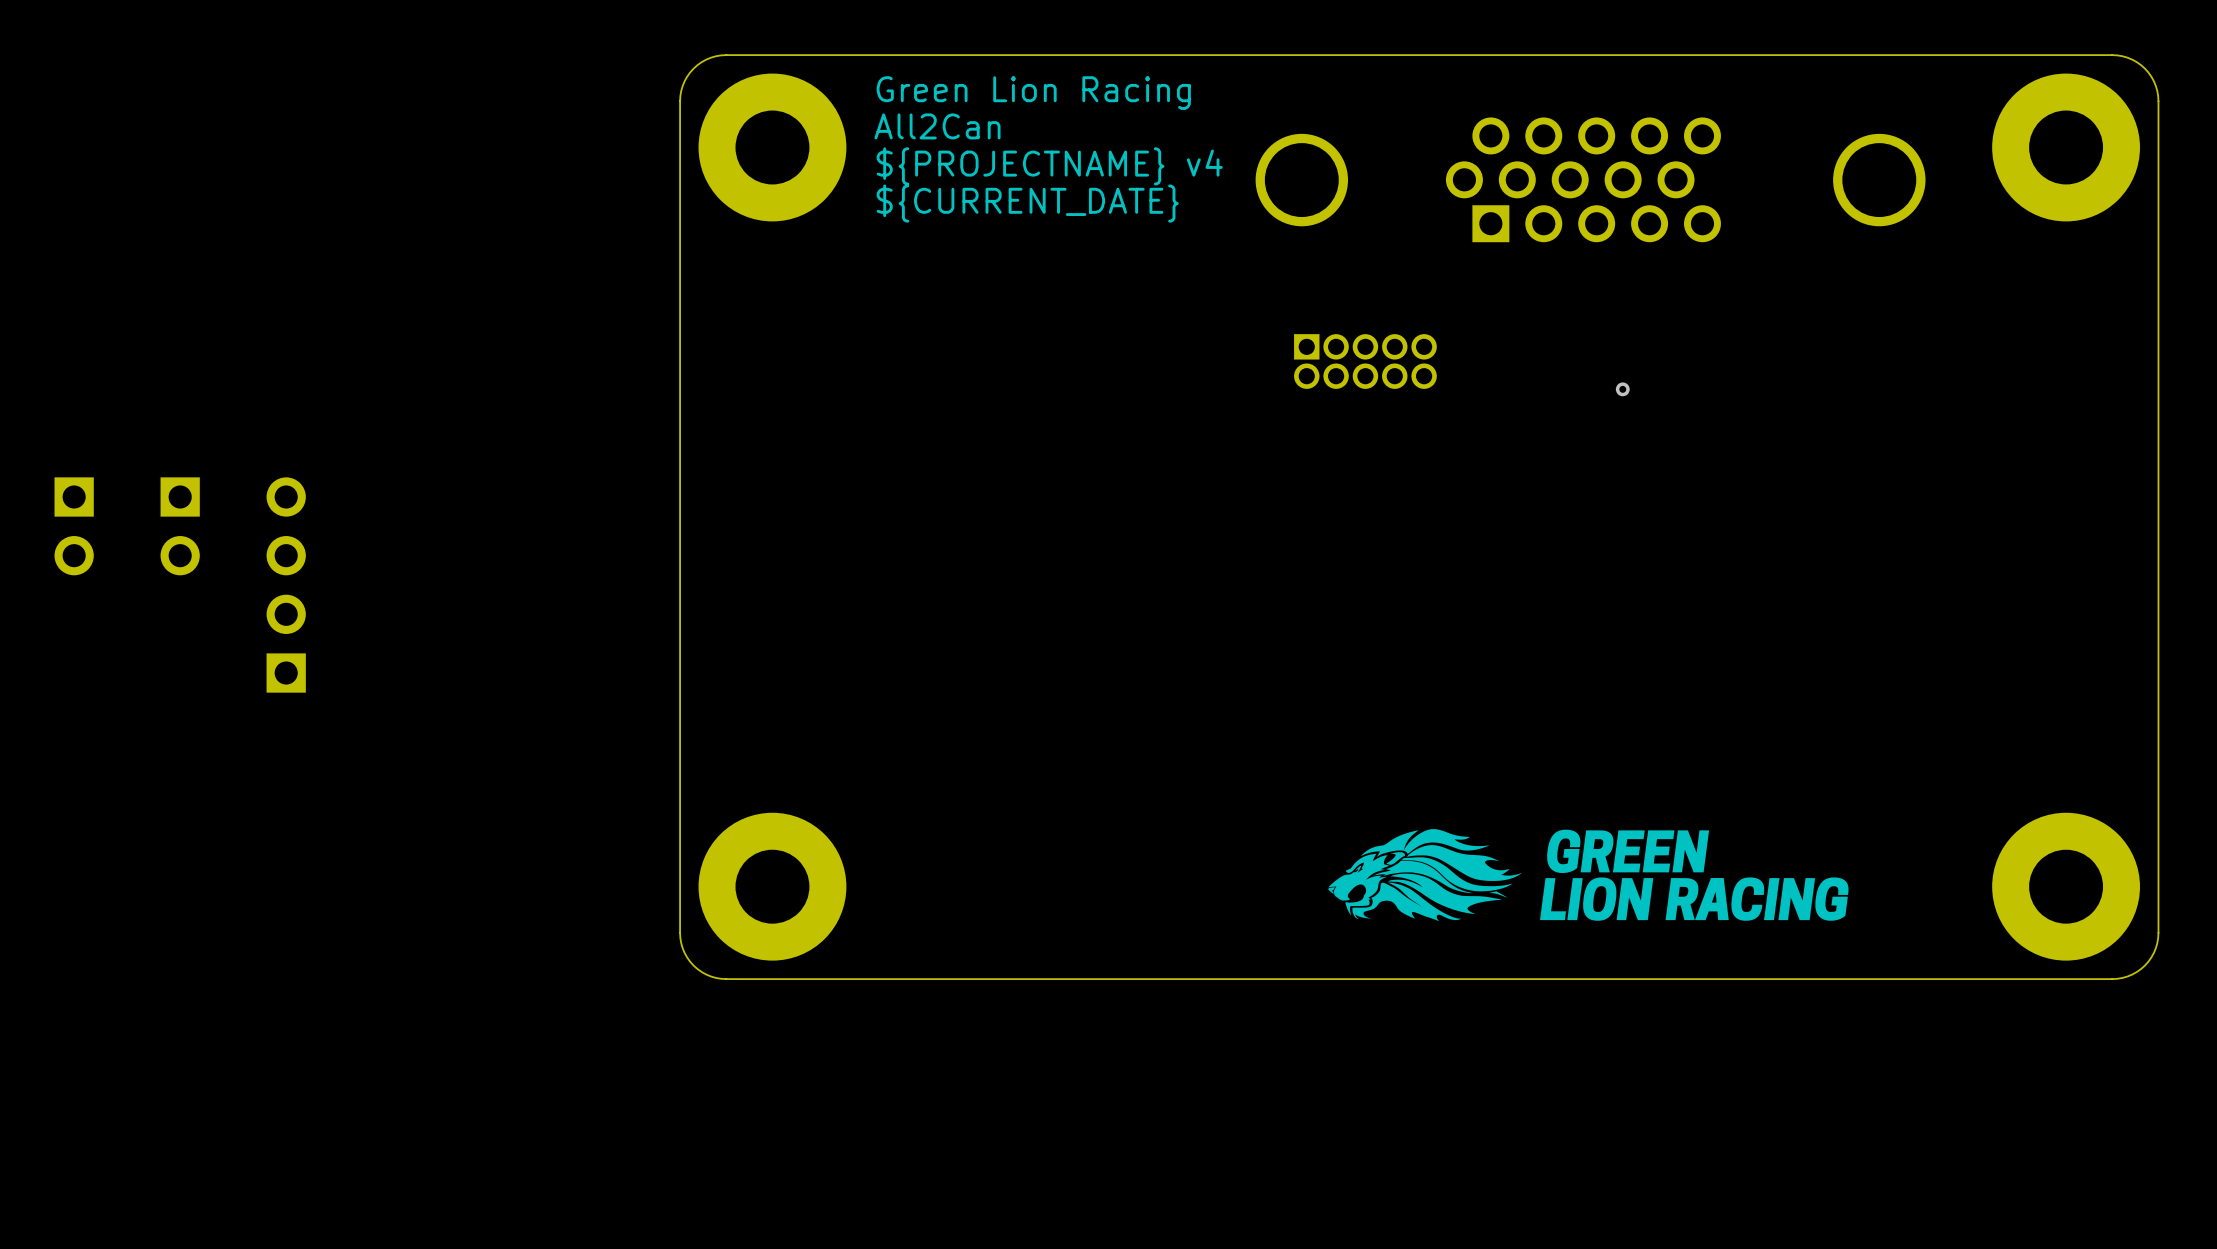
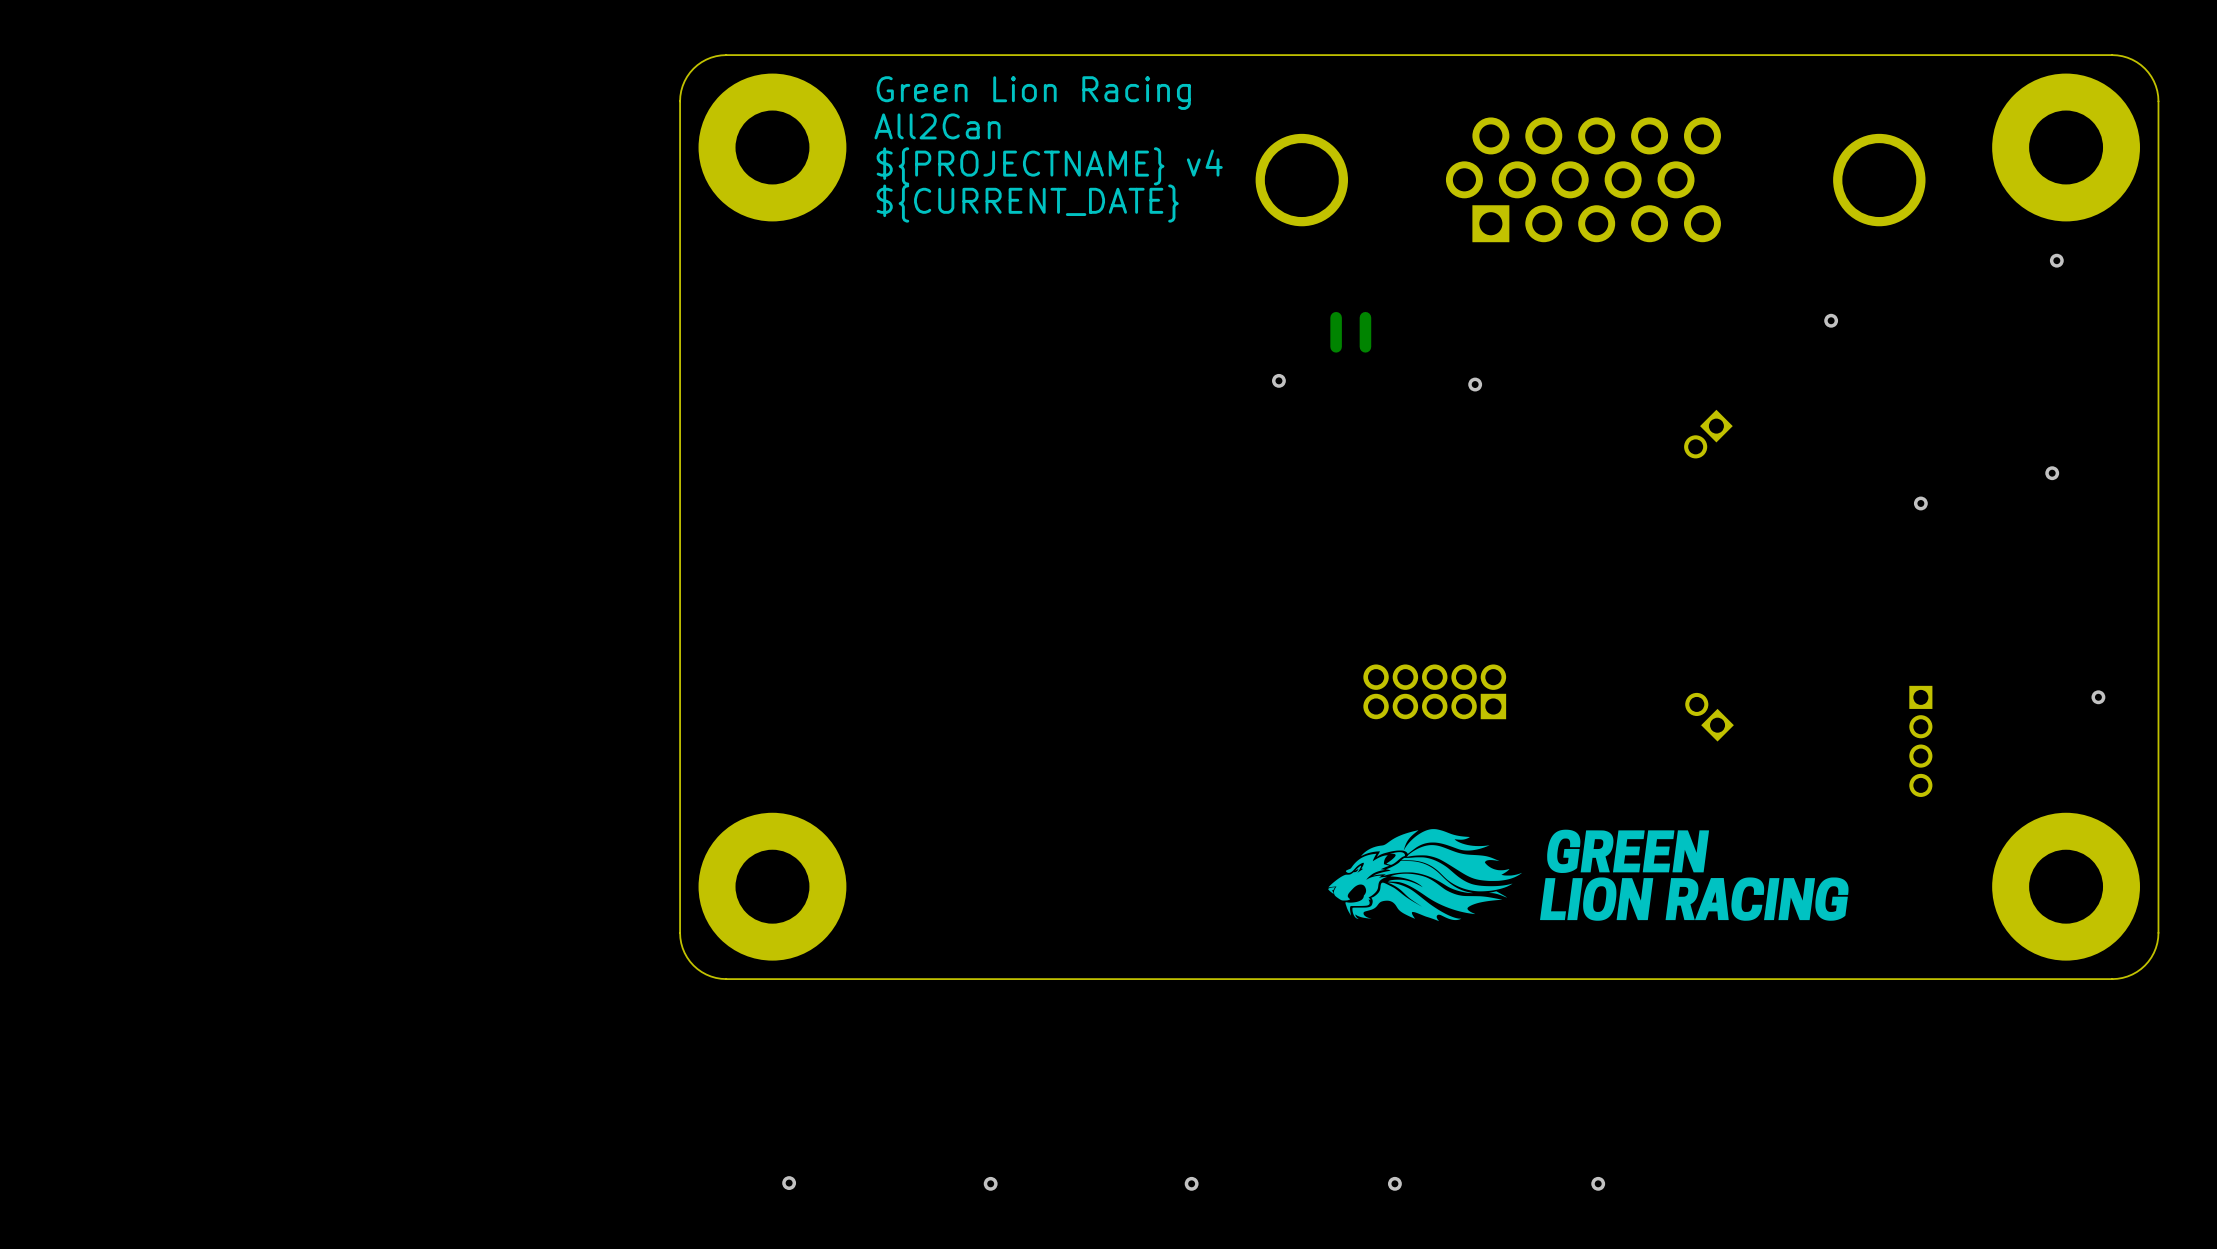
via: none -> (2056, 260)
track: none -> (1336, 317) (1336, 346)
track: none -> (1365, 317) (1365, 346)
via: none -> (1831, 320)
part rotation: 0° (1365, 361) -> 180° (1434, 691)
part position: (1365, 361) -> (1434, 691)
via: none -> (1278, 380)
via: none -> (1475, 384)
via: (1622, 389) -> none
part: none -> (1708, 434)
via: none -> (2052, 473)
via: none -> (1920, 503)
part: (74, 526) -> none
part: (180, 526) -> none
part: (286, 585) -> none
via: none -> (2098, 697)
part: none -> (1709, 717)
part: none -> (1920, 741)
via: none -> (789, 1183)
via: none -> (990, 1183)
via: none -> (1191, 1183)
via: none -> (1394, 1183)
via: none -> (1598, 1183)

